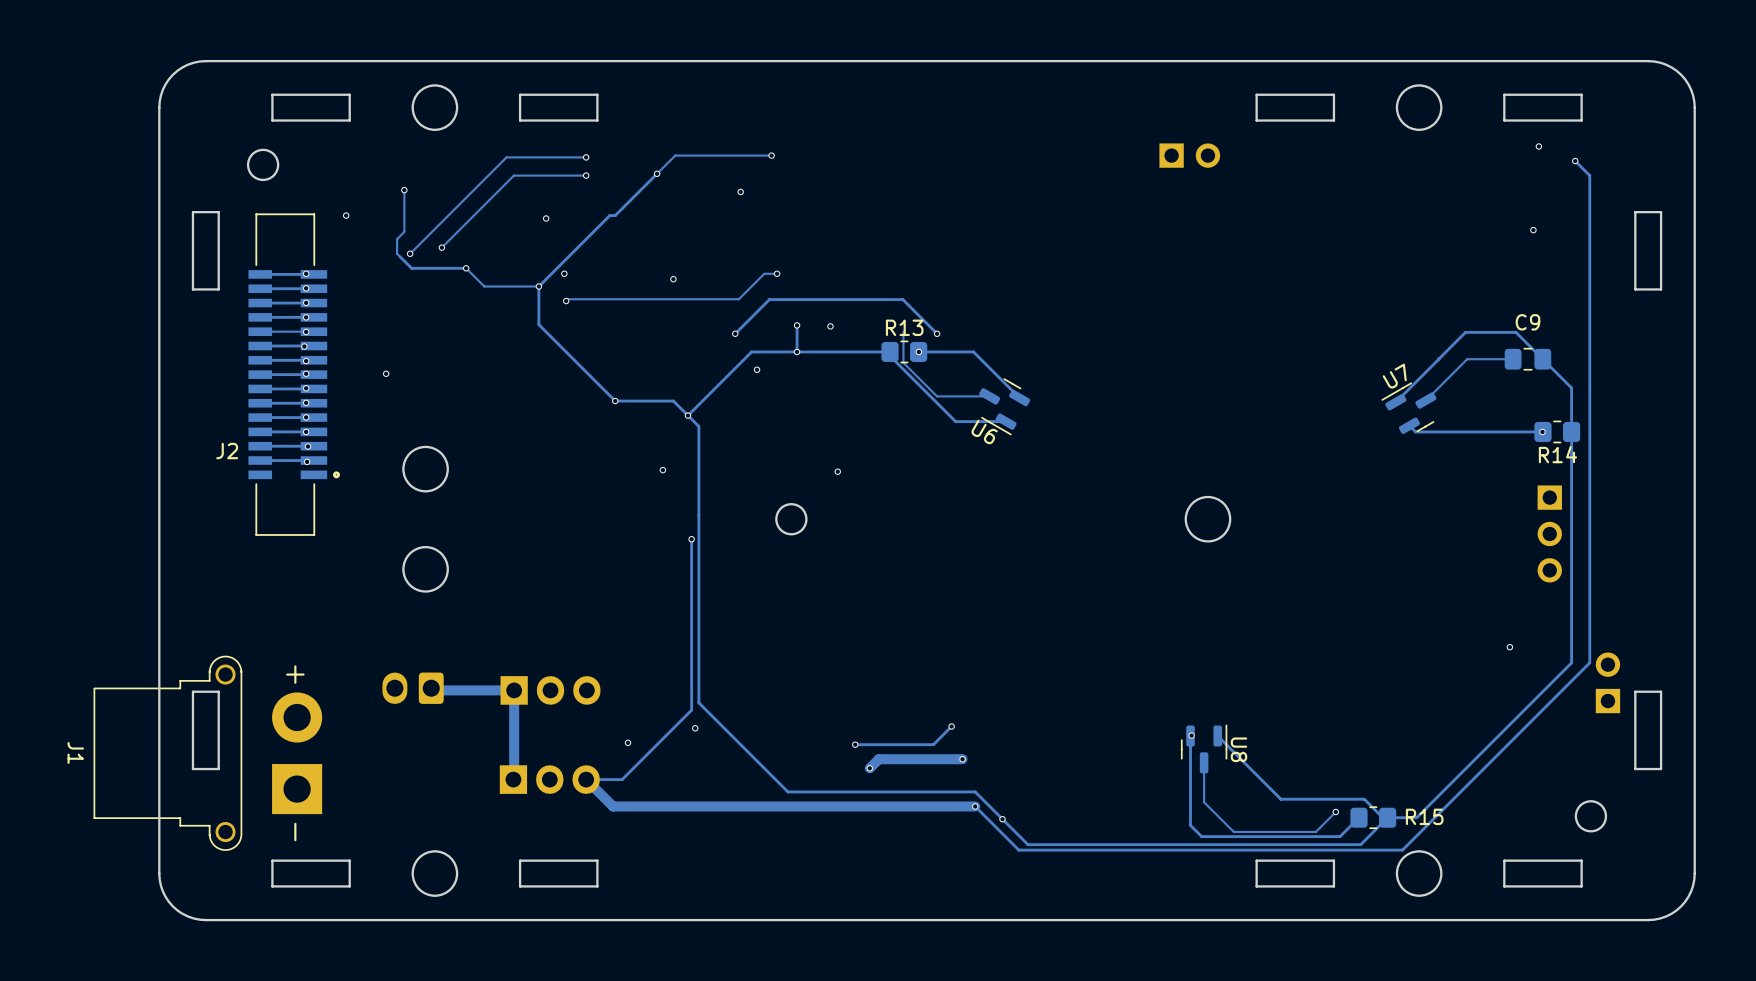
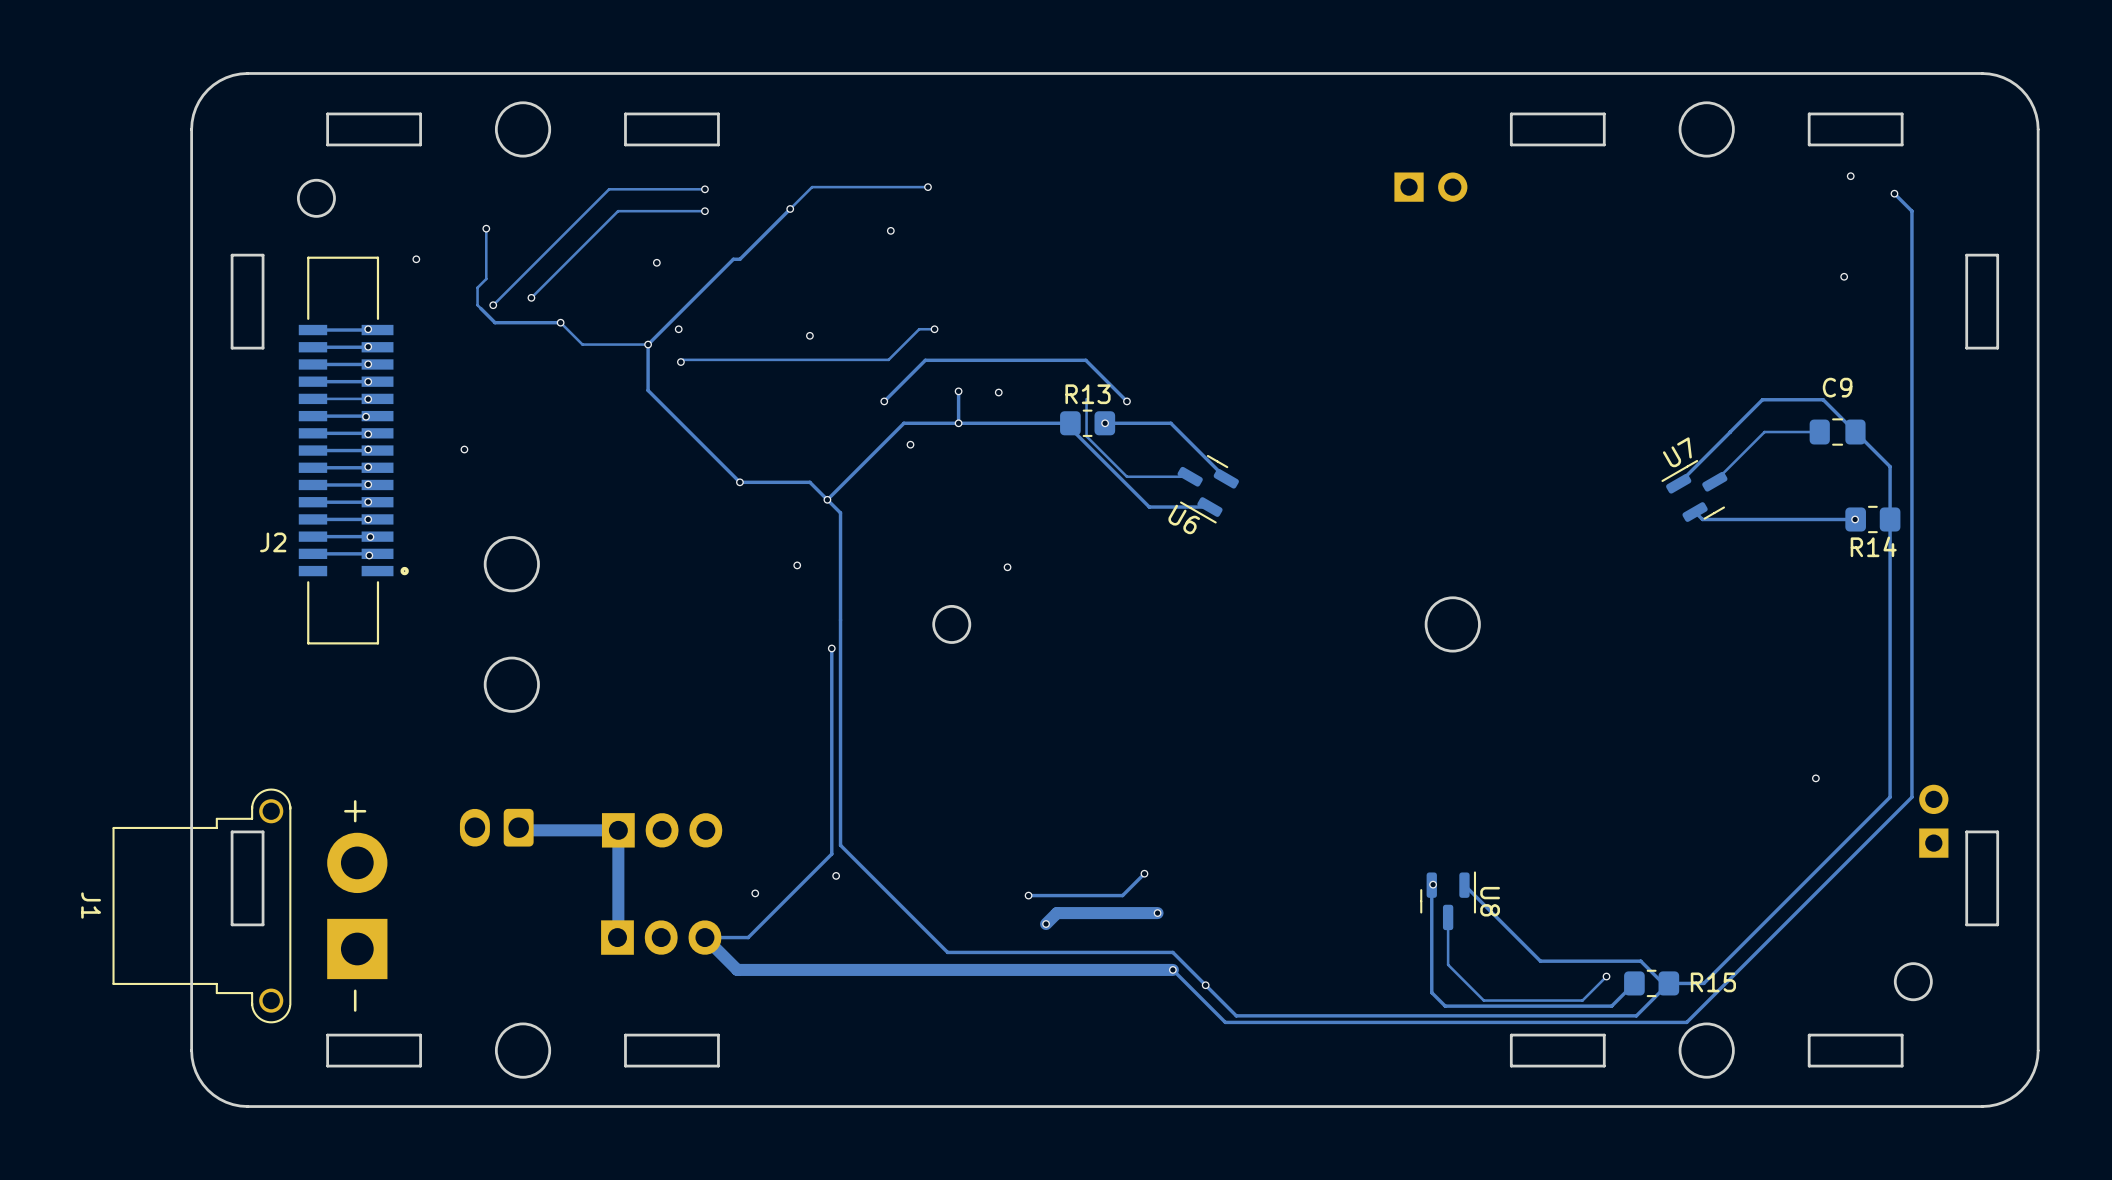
part: (1549, 533) -> none

